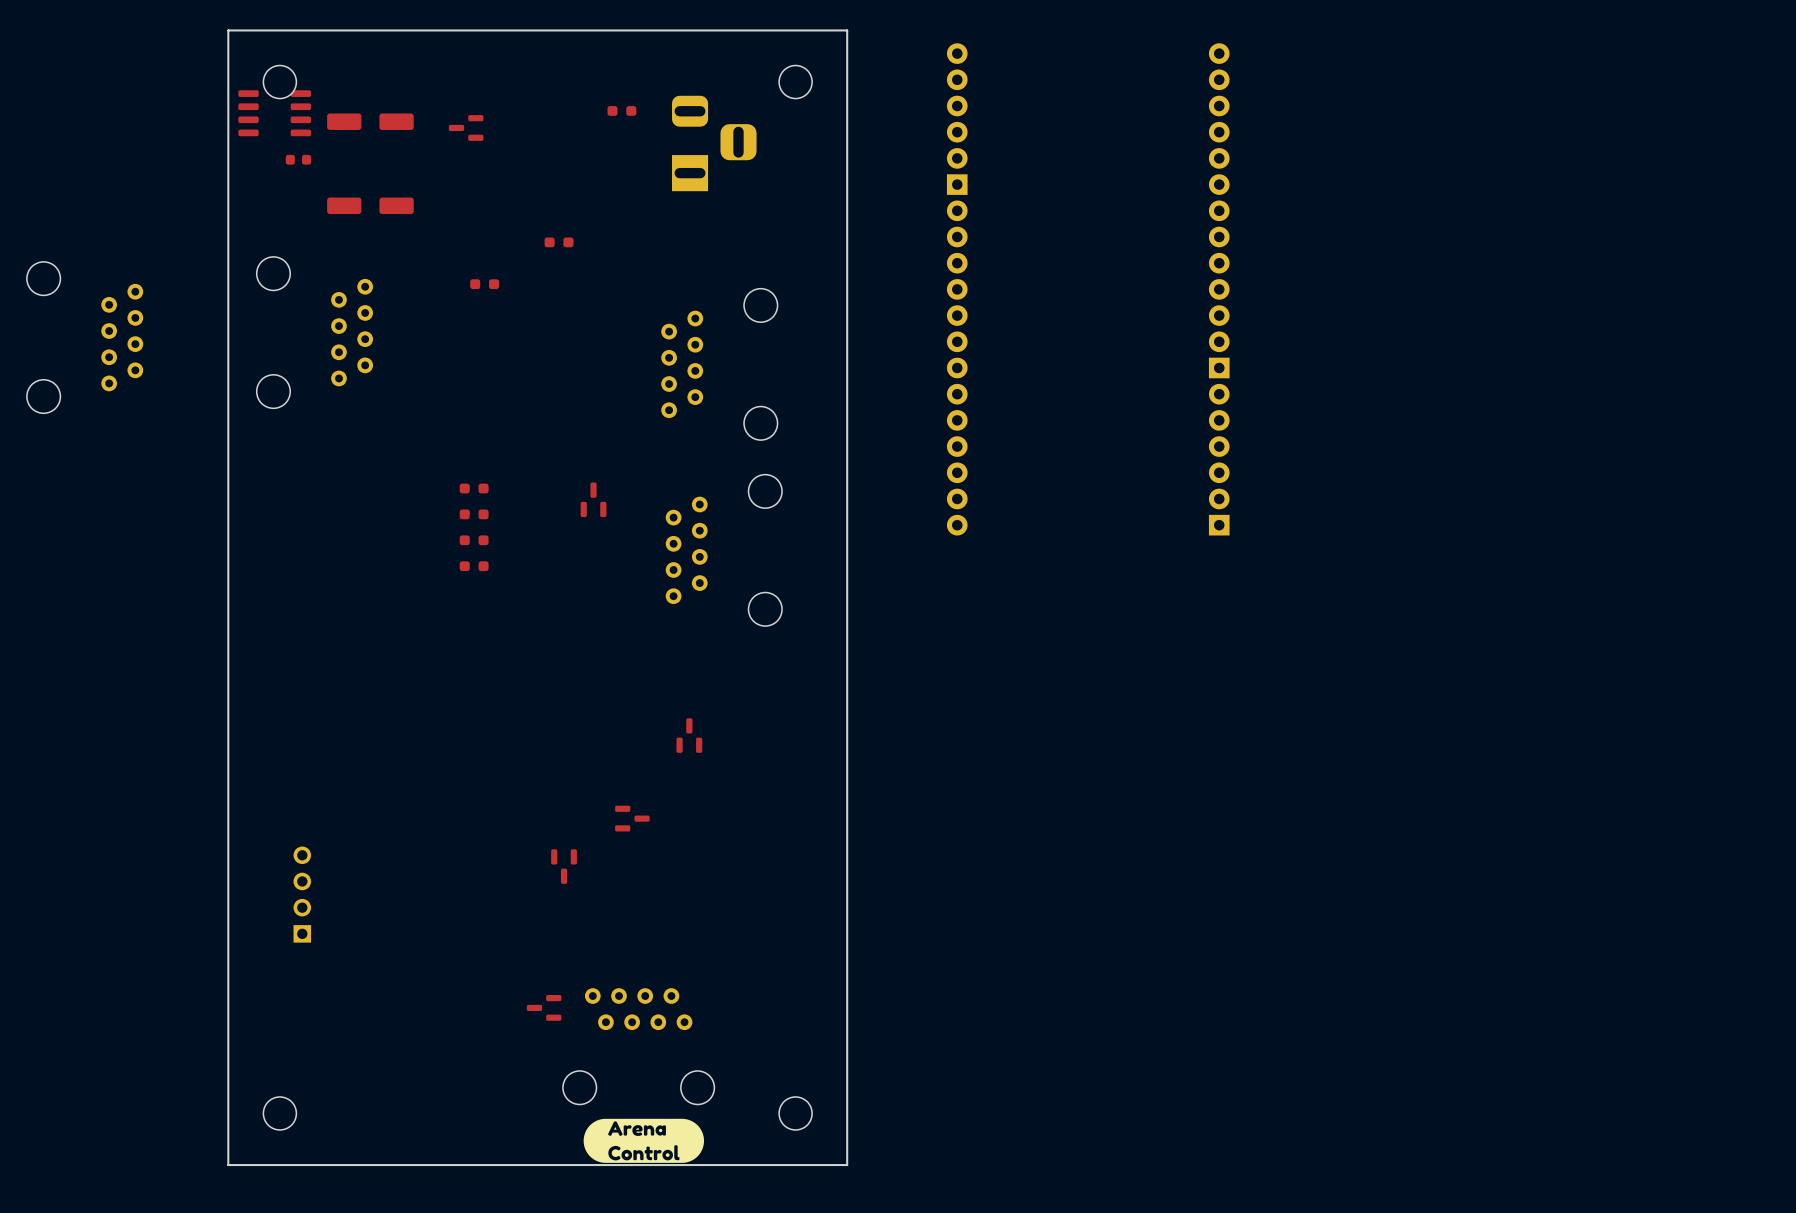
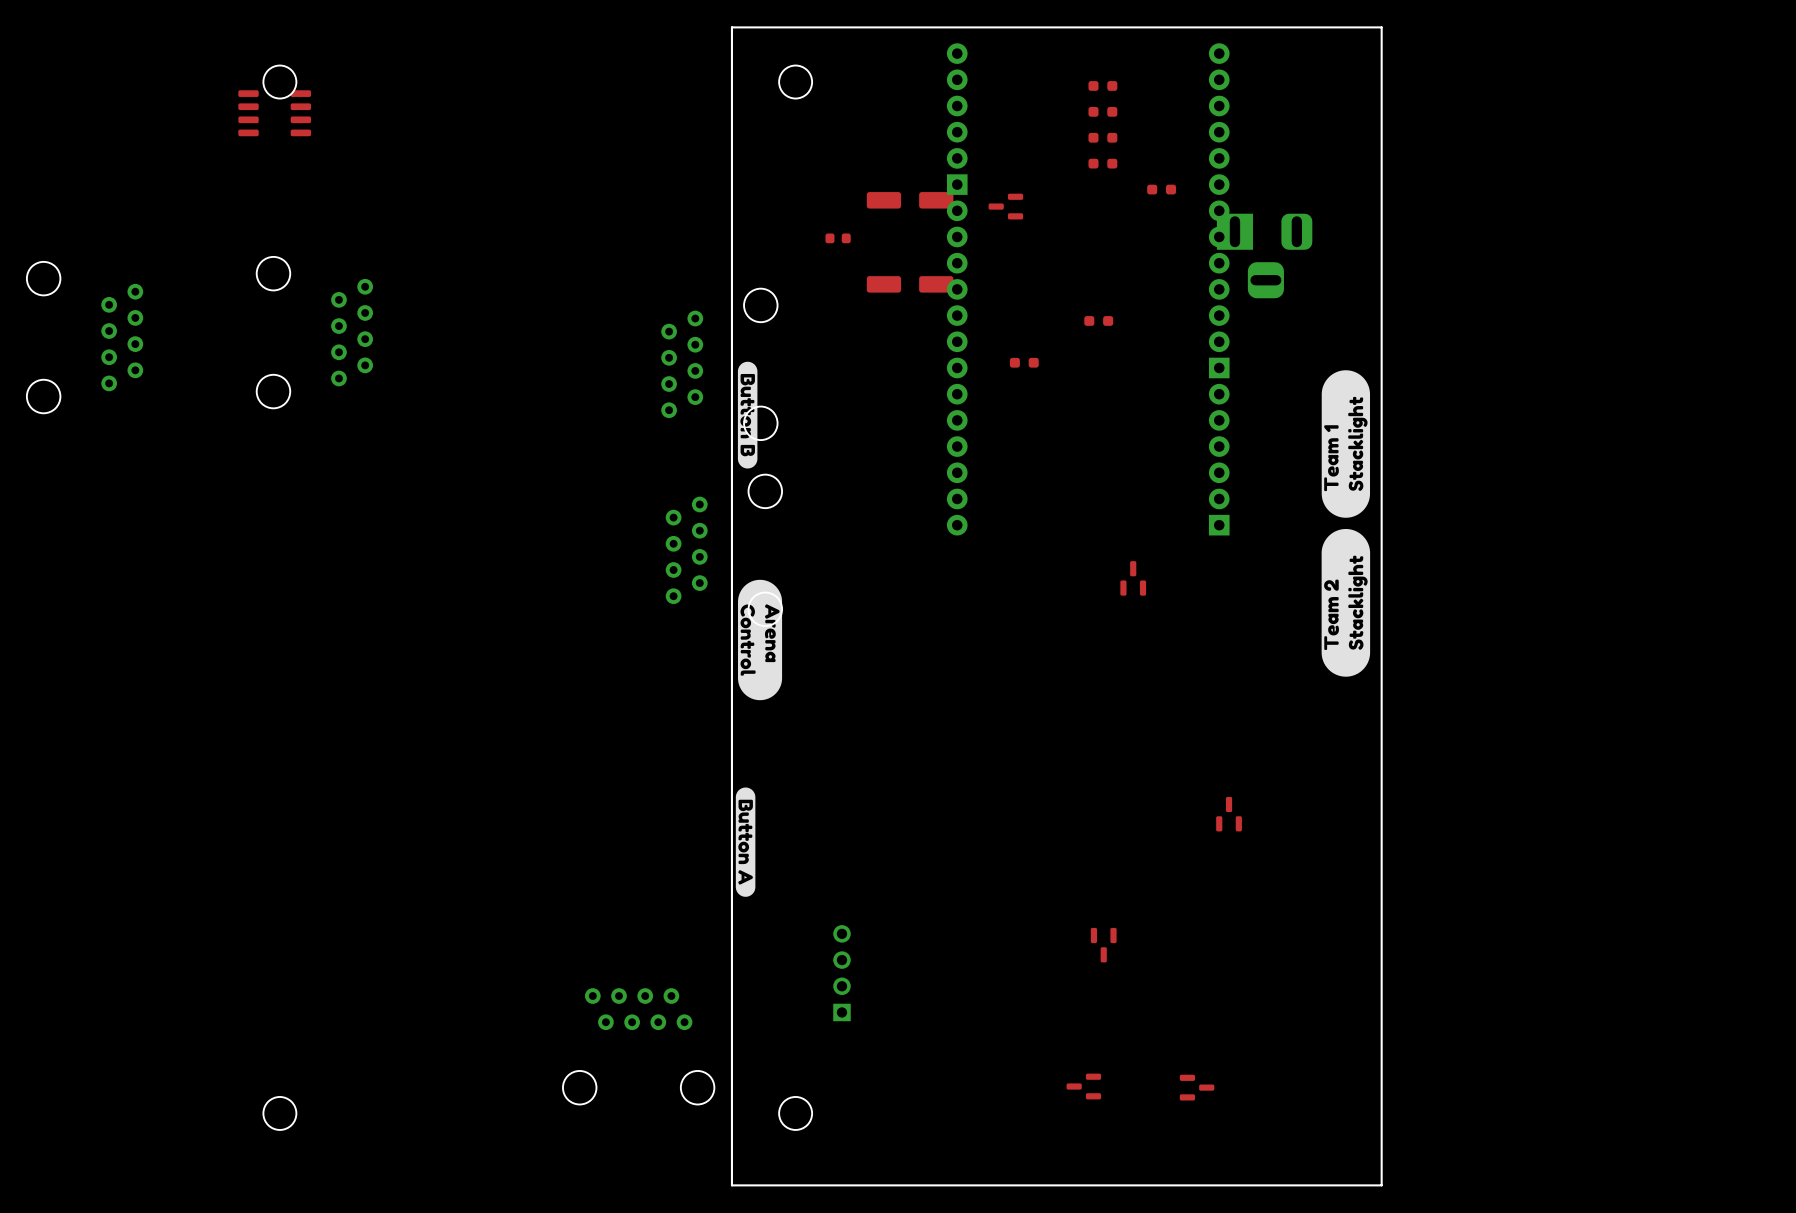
board edge: none -> (1381, 27) (731, 27) (731, 1185) (1381, 1185) (1381, 27)
board edge: (847, 30) (228, 30) (228, 1165) (847, 1165) (847, 30) -> none
part: none -> (1102, 85)
part: (621, 110) -> none
part: none -> (1102, 111)
part: (370, 121) -> none
part: (466, 127) -> none
part: none -> (1102, 137)
part: (714, 143) -> none
part: (298, 159) -> none
part: none -> (1102, 163)
part: none -> (1161, 189)
part: none -> (910, 200)
part: (370, 205) -> none
part: none -> (1005, 206)
part: none -> (838, 238)
part: (559, 242) -> none
part: none -> (1264, 255)
part: (484, 284) -> none
part: none -> (910, 284)
part: none -> (1098, 320)
drawing: none -> [737, 361, 758, 469]
part: none -> (1024, 362)
drawing: none -> [1321, 370, 1371, 677]
part: (474, 488) -> none
part: (593, 499) -> none
part: (474, 514) -> none
part: (474, 540) -> none
part: (474, 566) -> none
part: none -> (1133, 578)
drawing: none -> [738, 579, 783, 701]
part: (689, 735) -> none
drawing: none -> [735, 787, 756, 897]
part: none -> (1229, 814)
part: (632, 818) -> none
part: (564, 866) -> none
part: (302, 894) -> none
part: none -> (1103, 945)
part: none -> (841, 973)
part: (544, 1007) -> none
part: none -> (1083, 1086)
part: none -> (1197, 1087)
drawing: [583, 1118, 705, 1163] -> none

